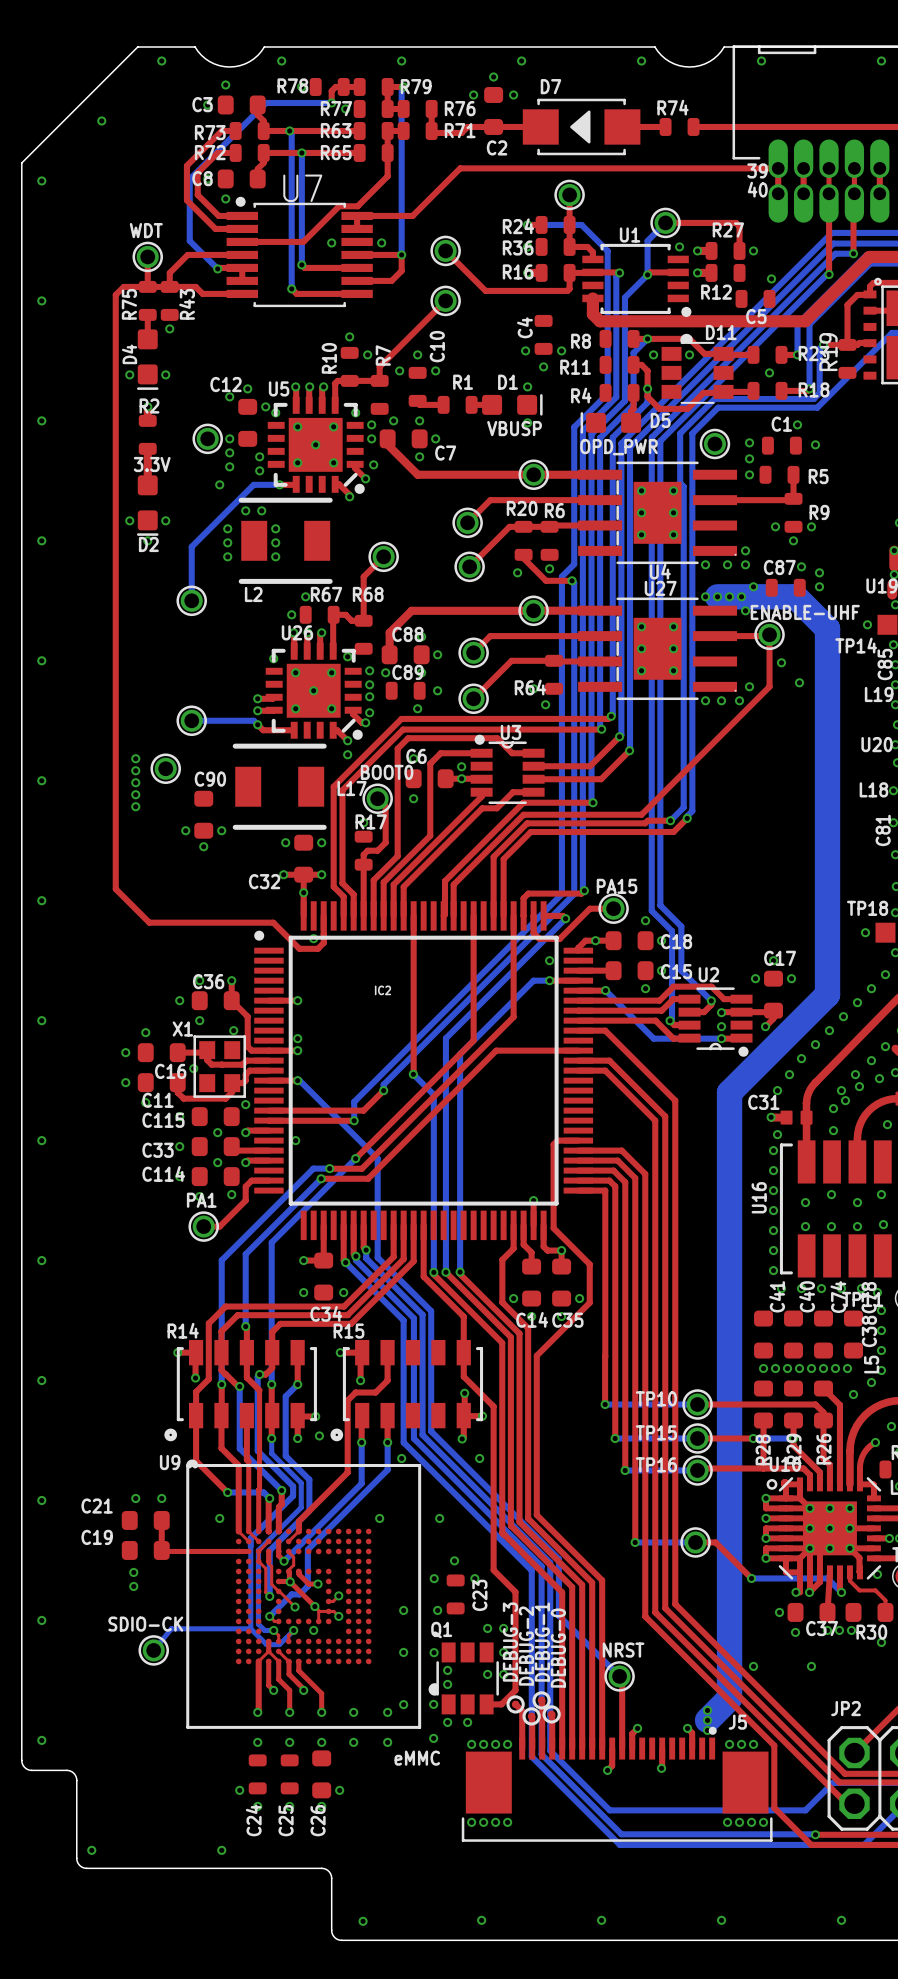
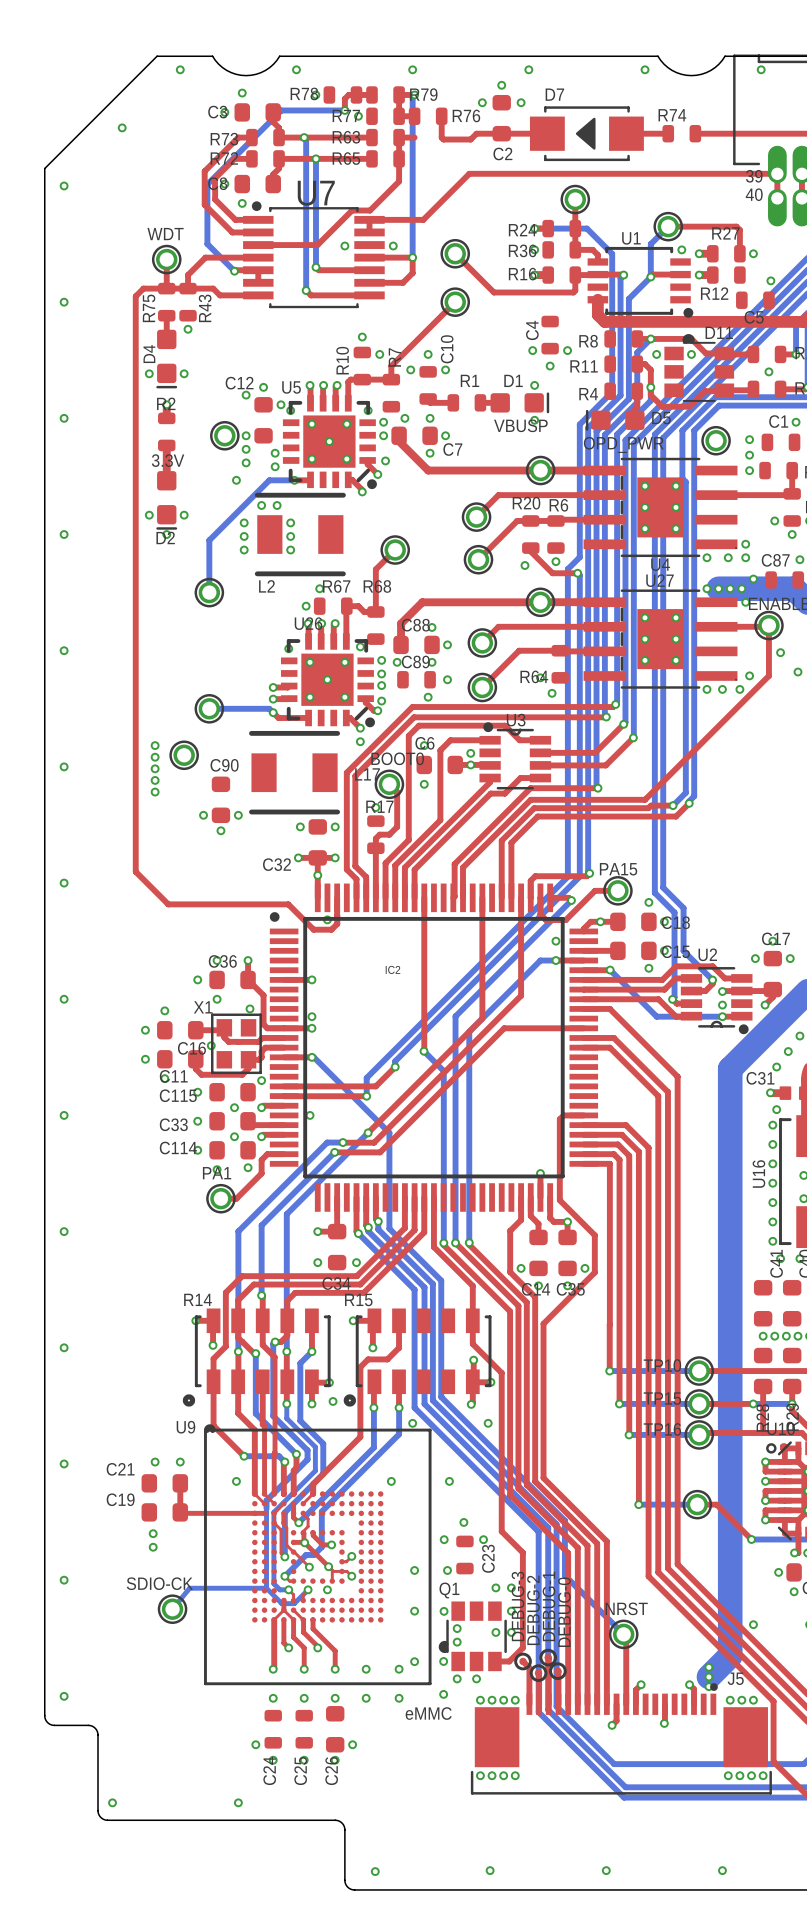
R71: (417, 130) -> none

